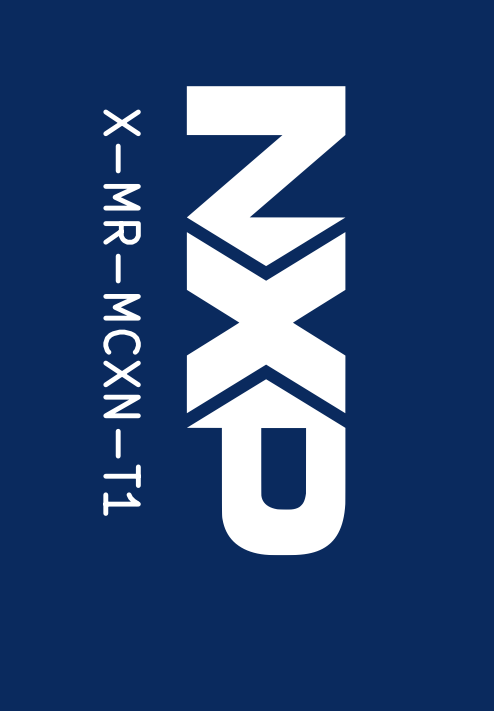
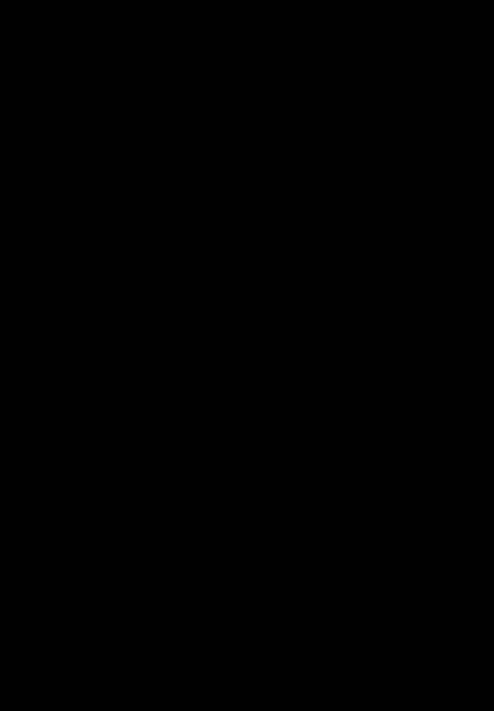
drawing: [186, 86, 346, 556] -> none
text: X-MR-MCXN-T1 (122, 312) -> none

